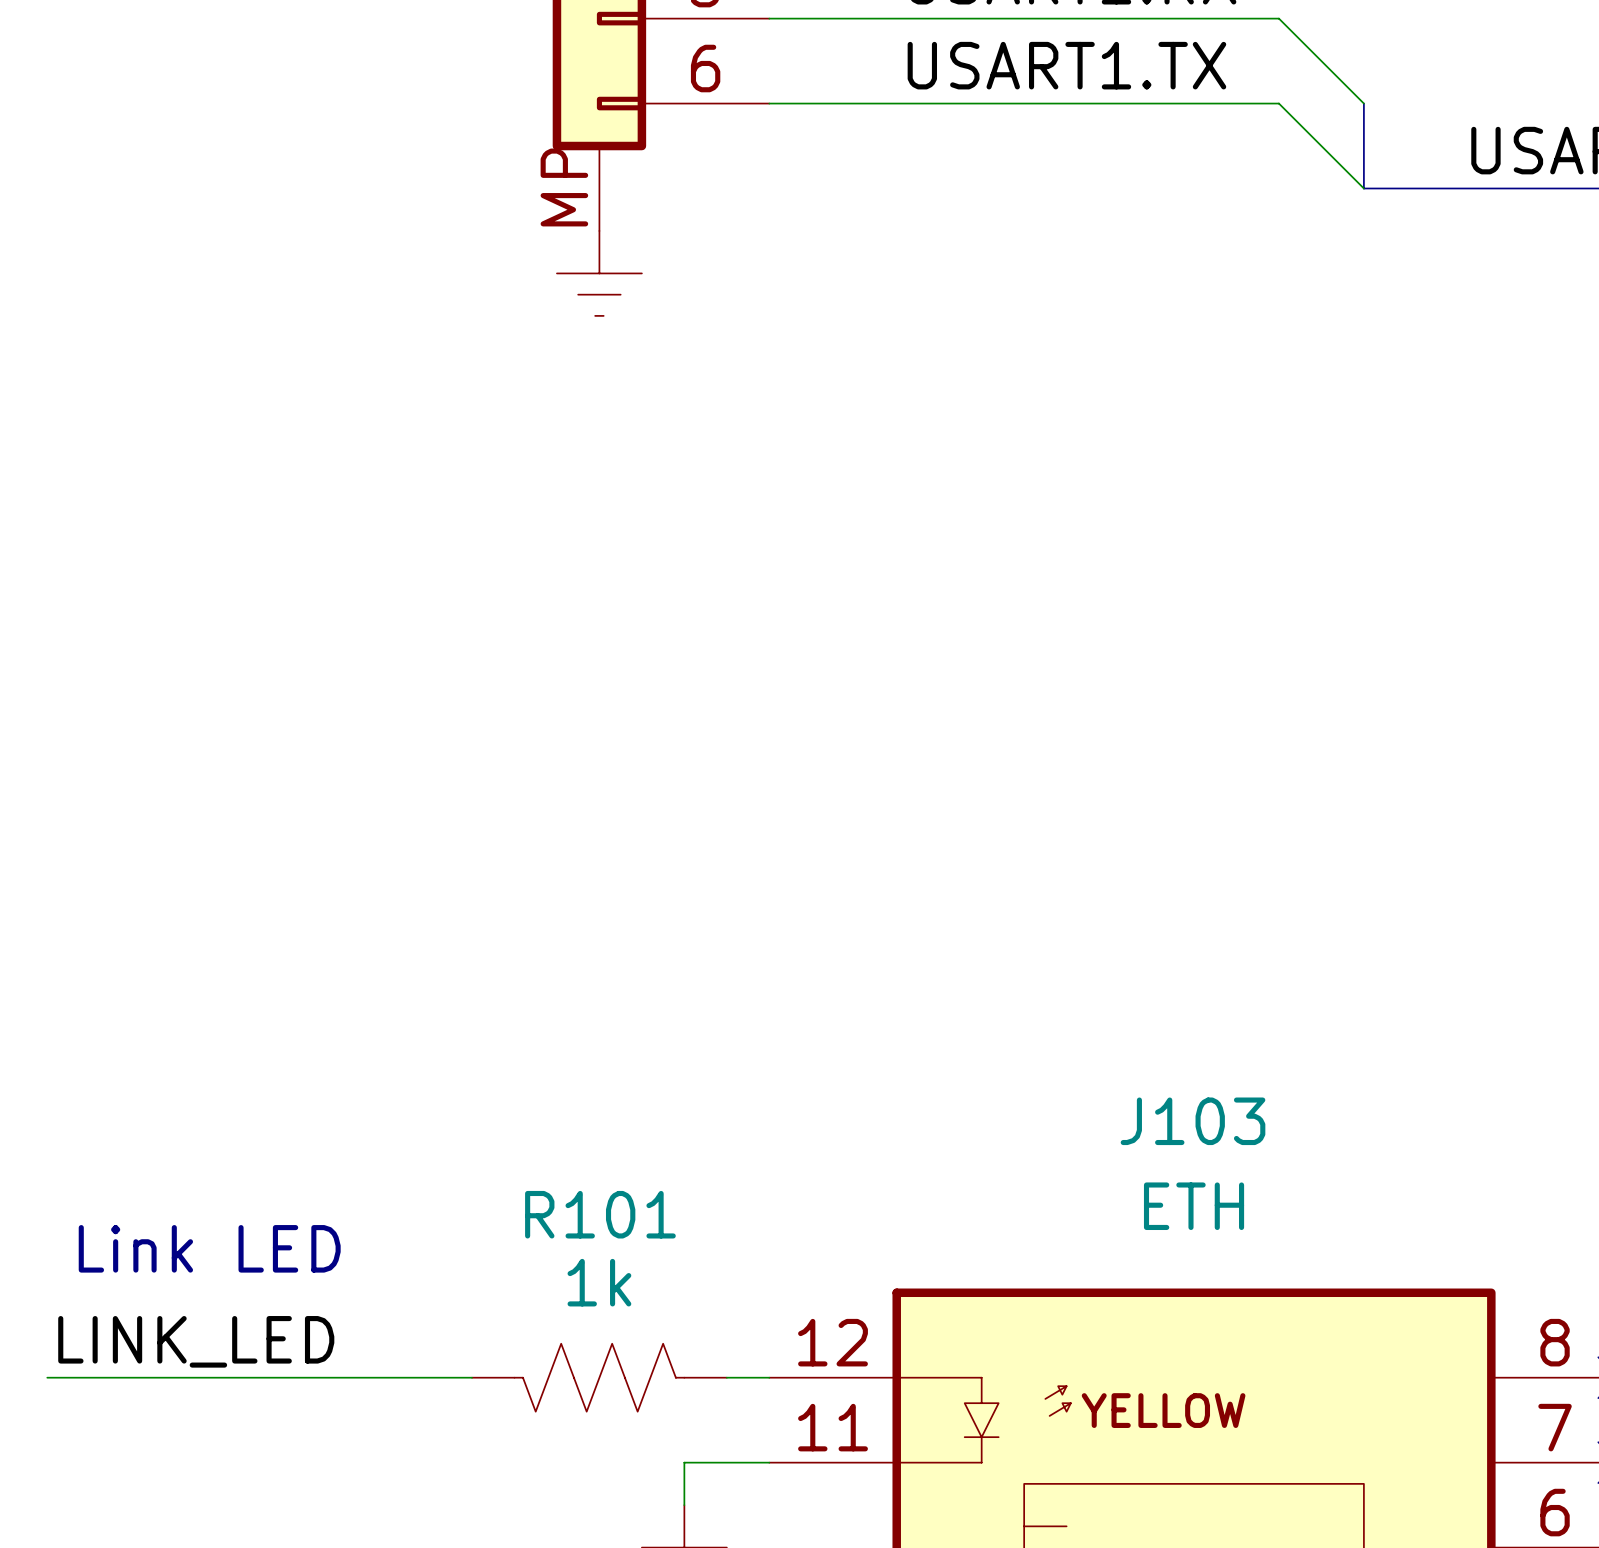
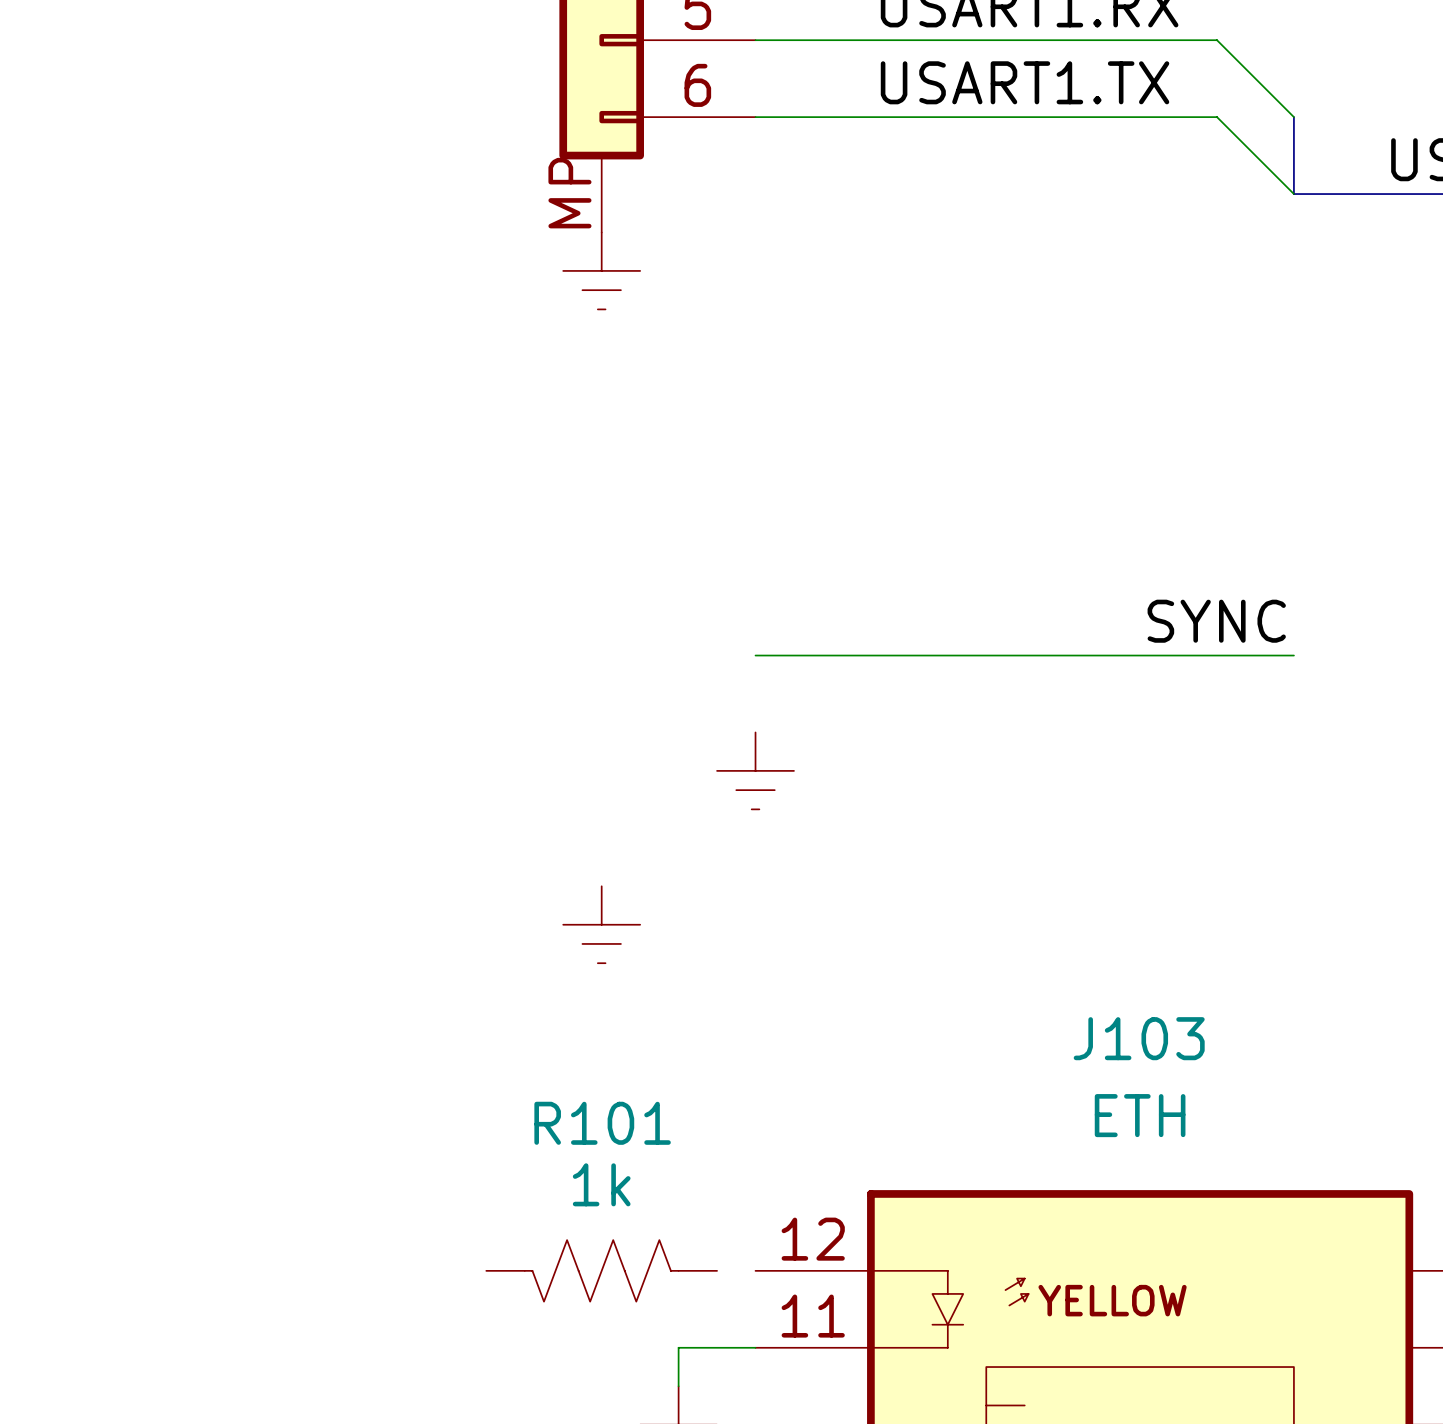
label: none -> SYNC (1216, 621)
wire: none -> (755, 655) (1293, 655)
power symbol: none -> (755, 770)
power symbol: none -> (601, 924)
text: Link LED (209, 1248) -> none
label: LINK_LED (196, 1341) -> none
wire: (47, 1377) (472, 1377) -> none
wire: (726, 1377) (769, 1377) -> none

